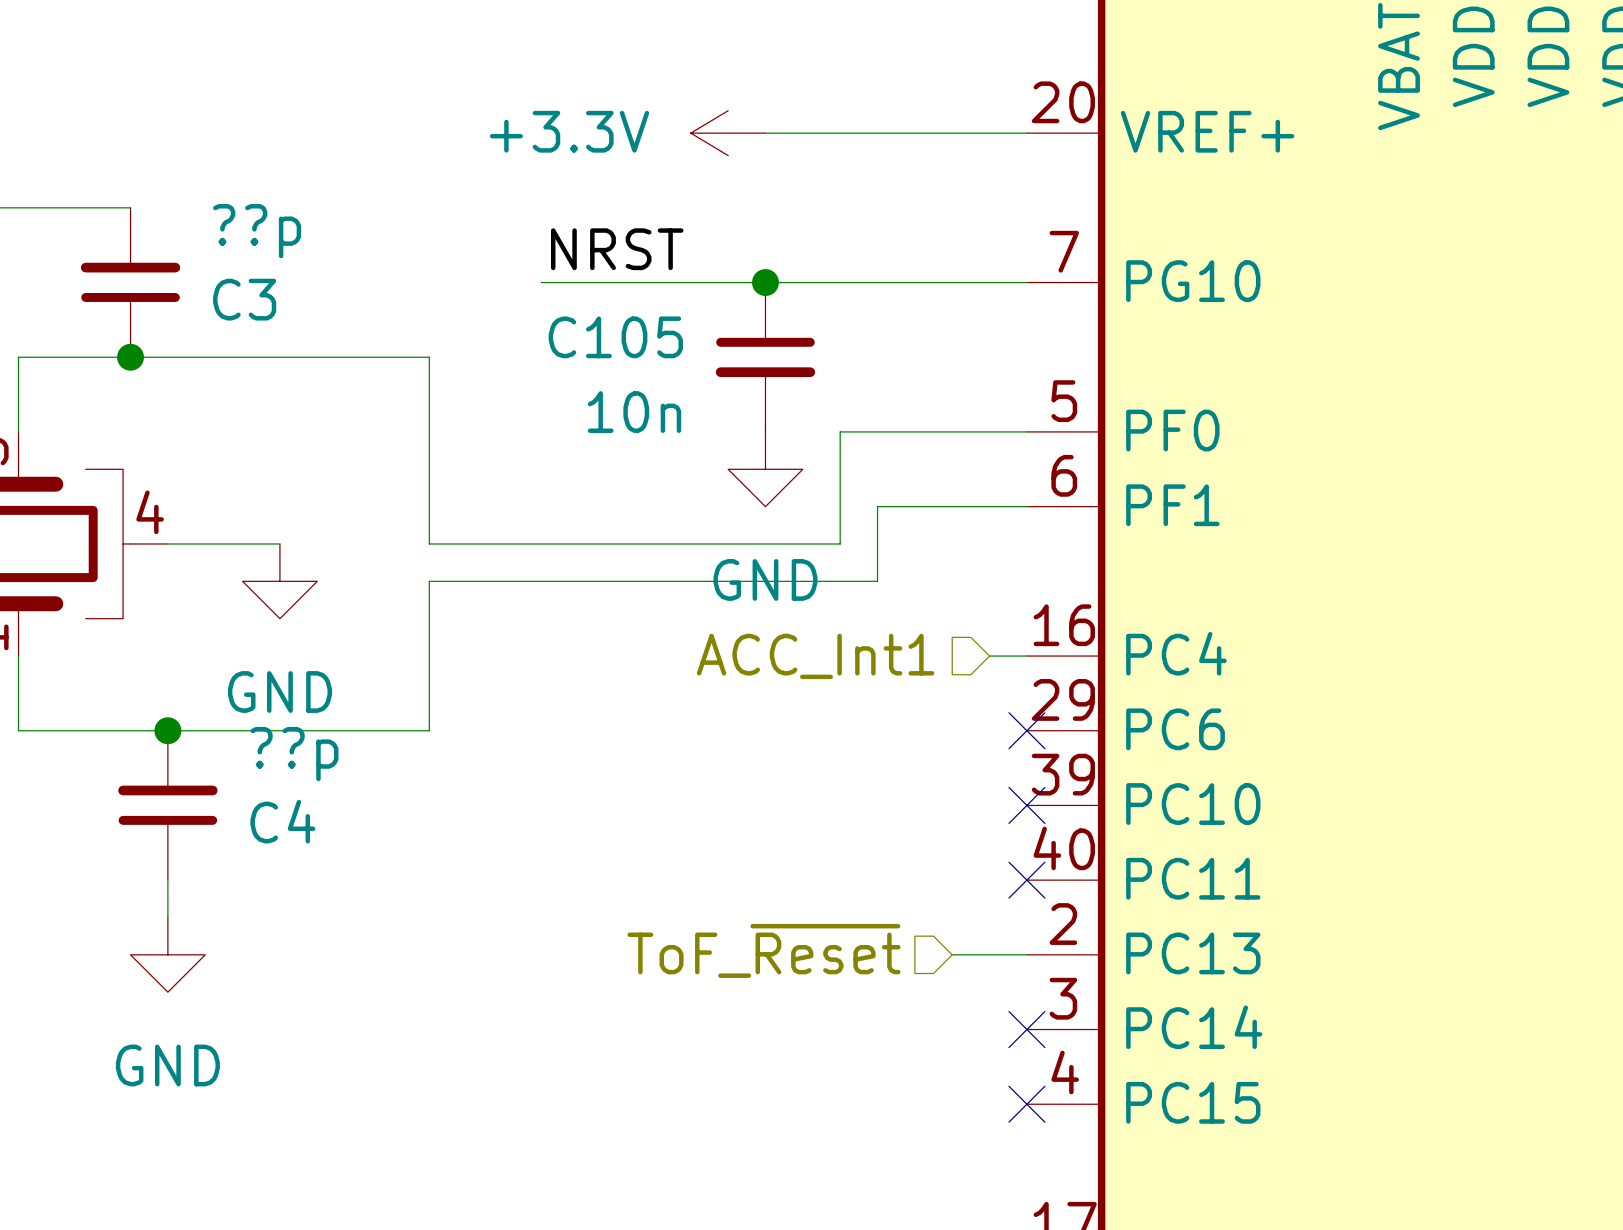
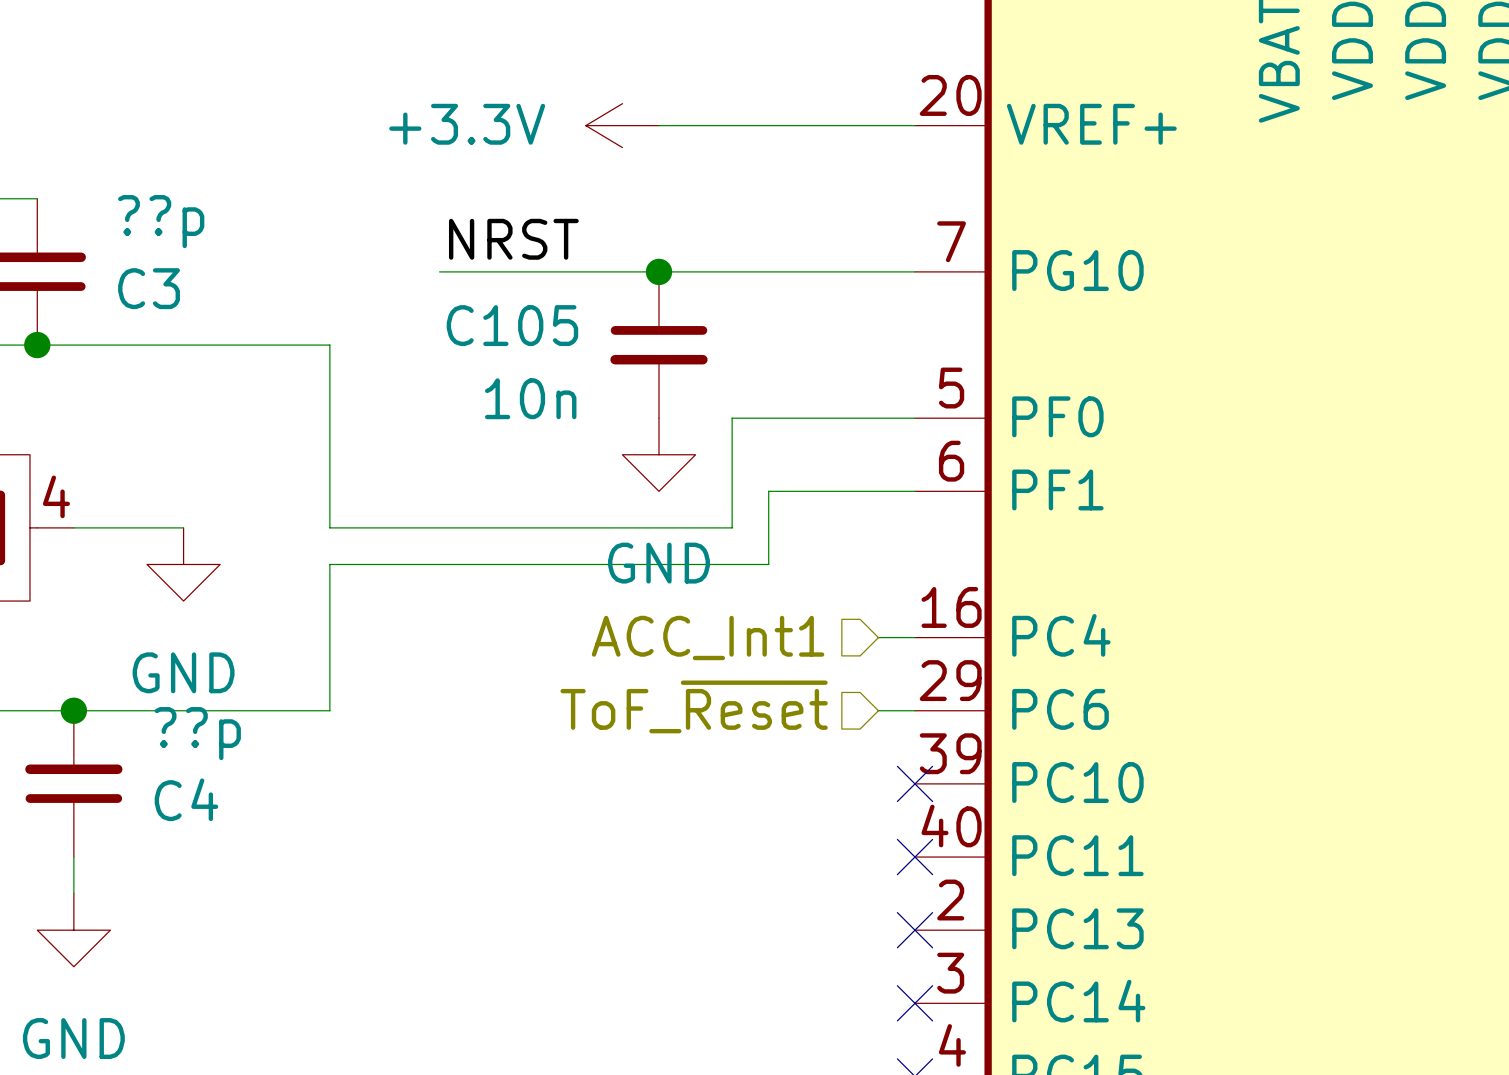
wire: none -> (878, 710) (914, 710)
no-connect mark: (1026, 730) -> none
hierarchical label position: ToF_~{Reset} (764, 950) -> ToF_~{Reset} (694, 706)
wire: (952, 954) (1026, 954) -> none
no-connect mark: none -> (914, 930)

